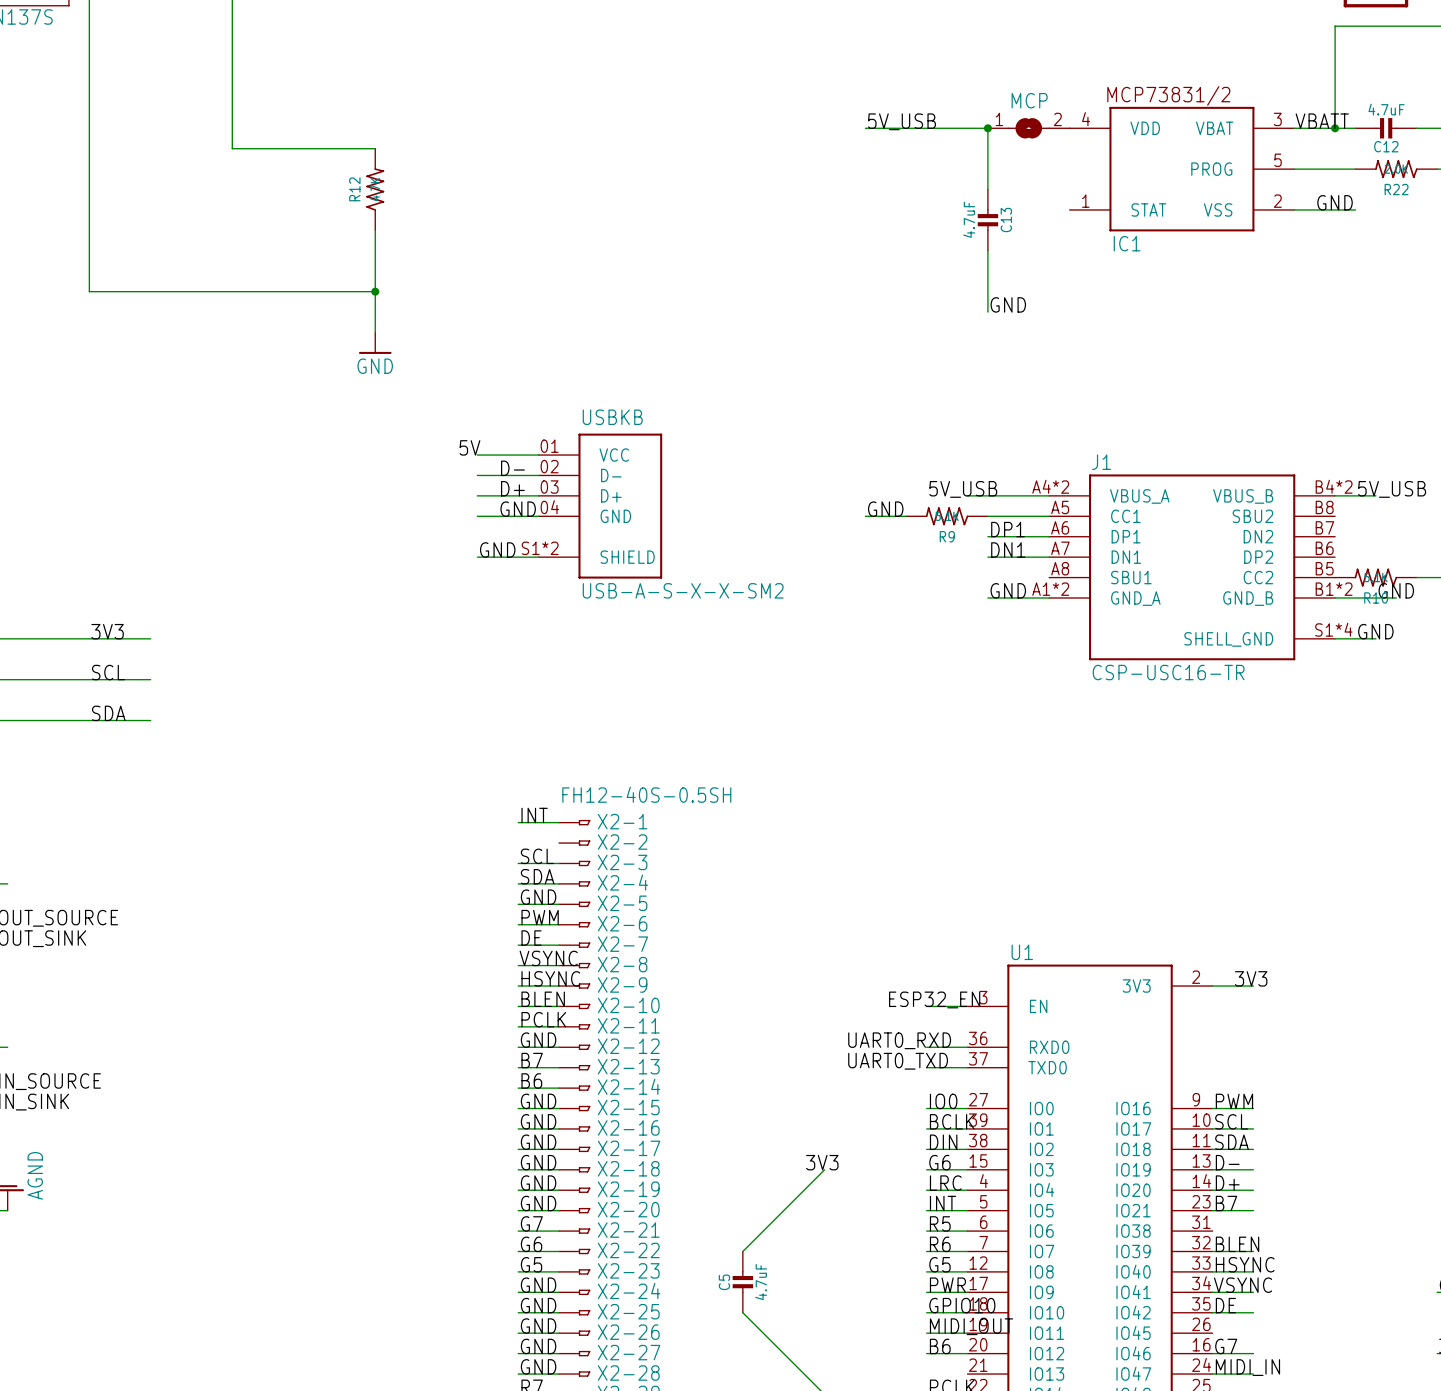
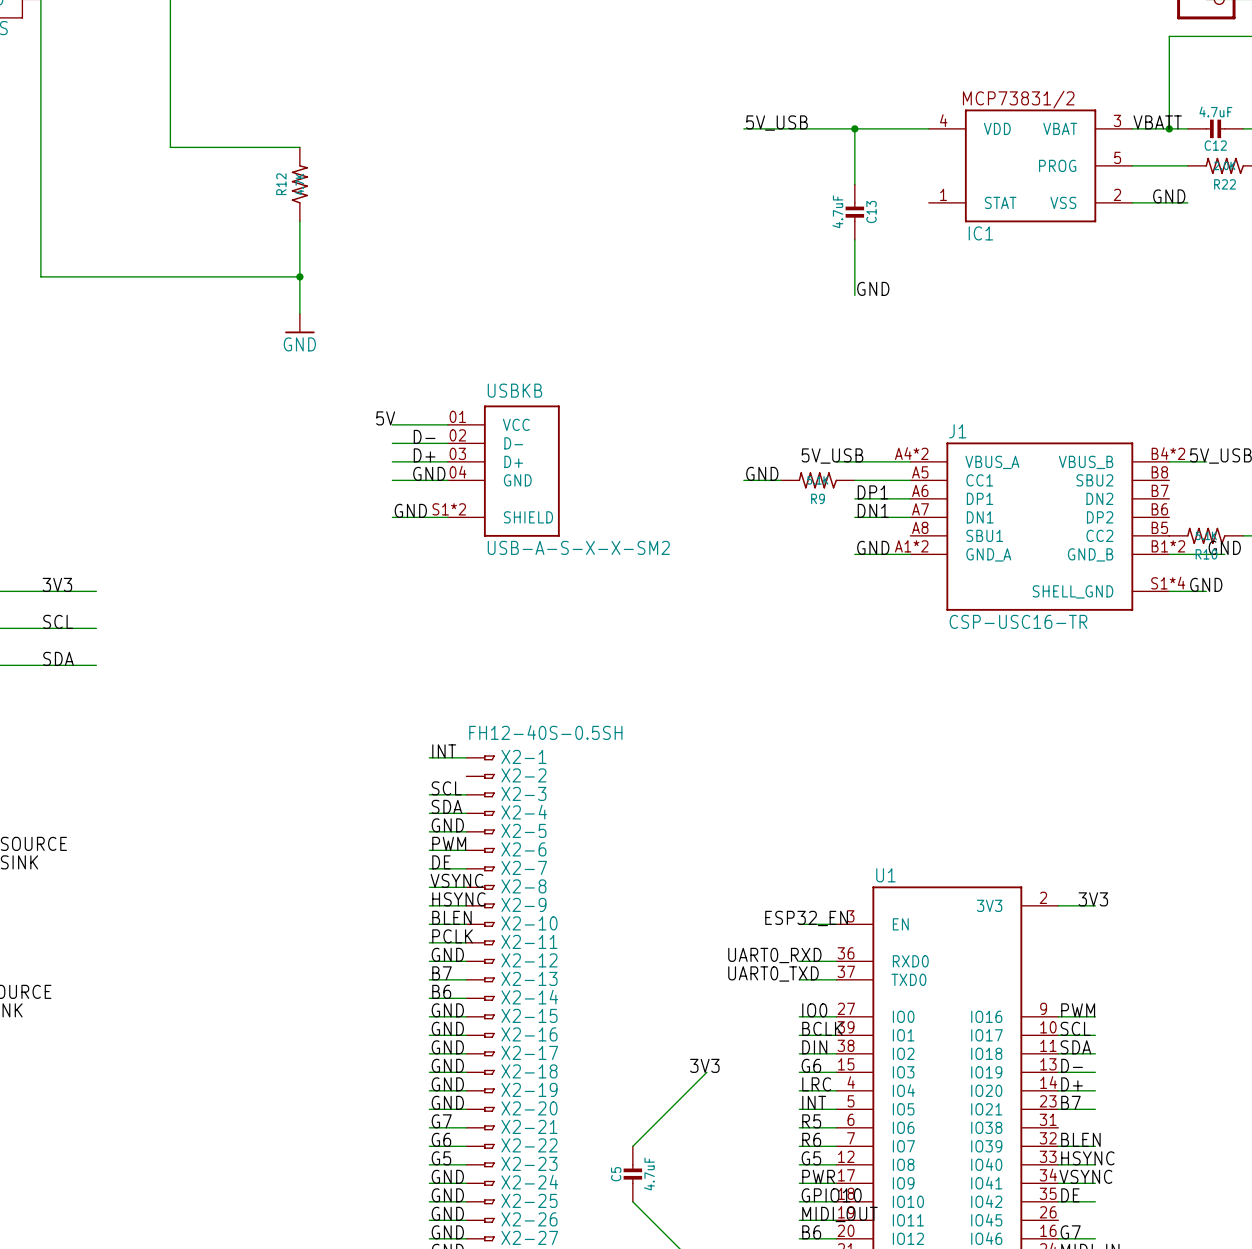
MCP: (1028, 128) -> none

